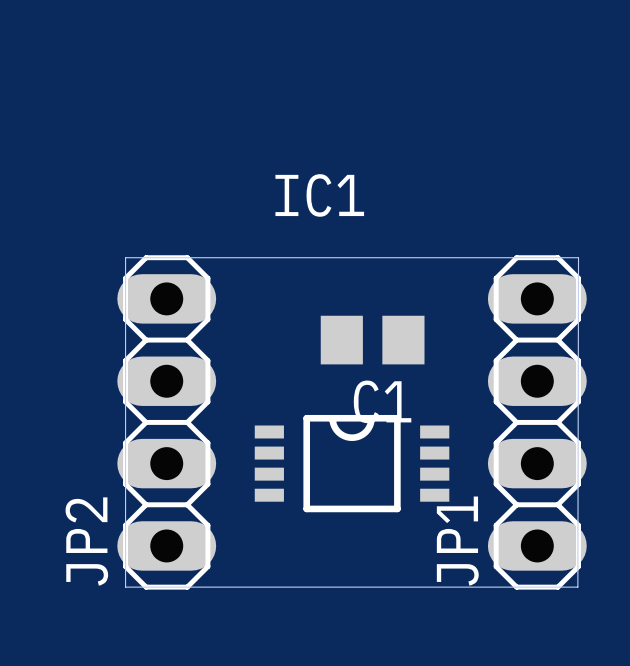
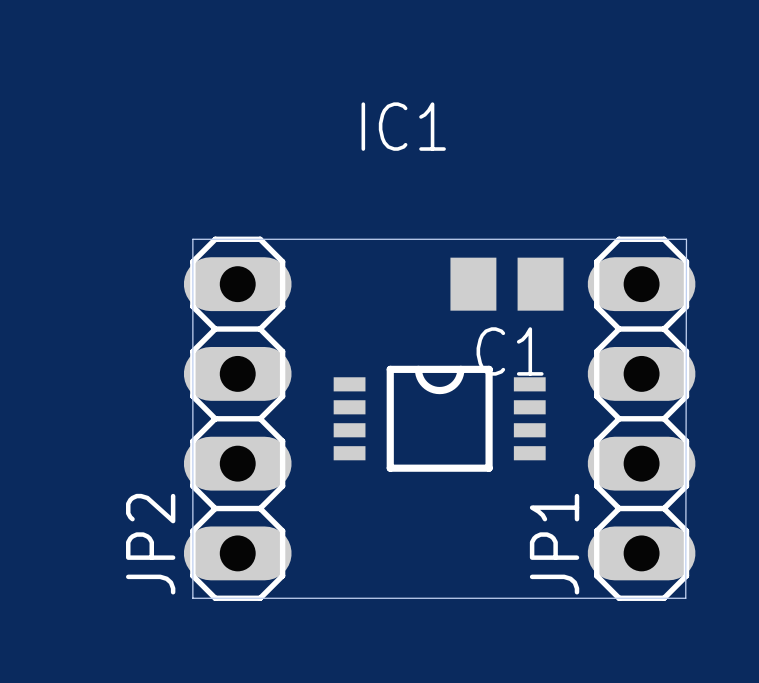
C1 position: (372, 340) -> (506, 284)
IC1 position: (352, 463) -> (439, 418)

